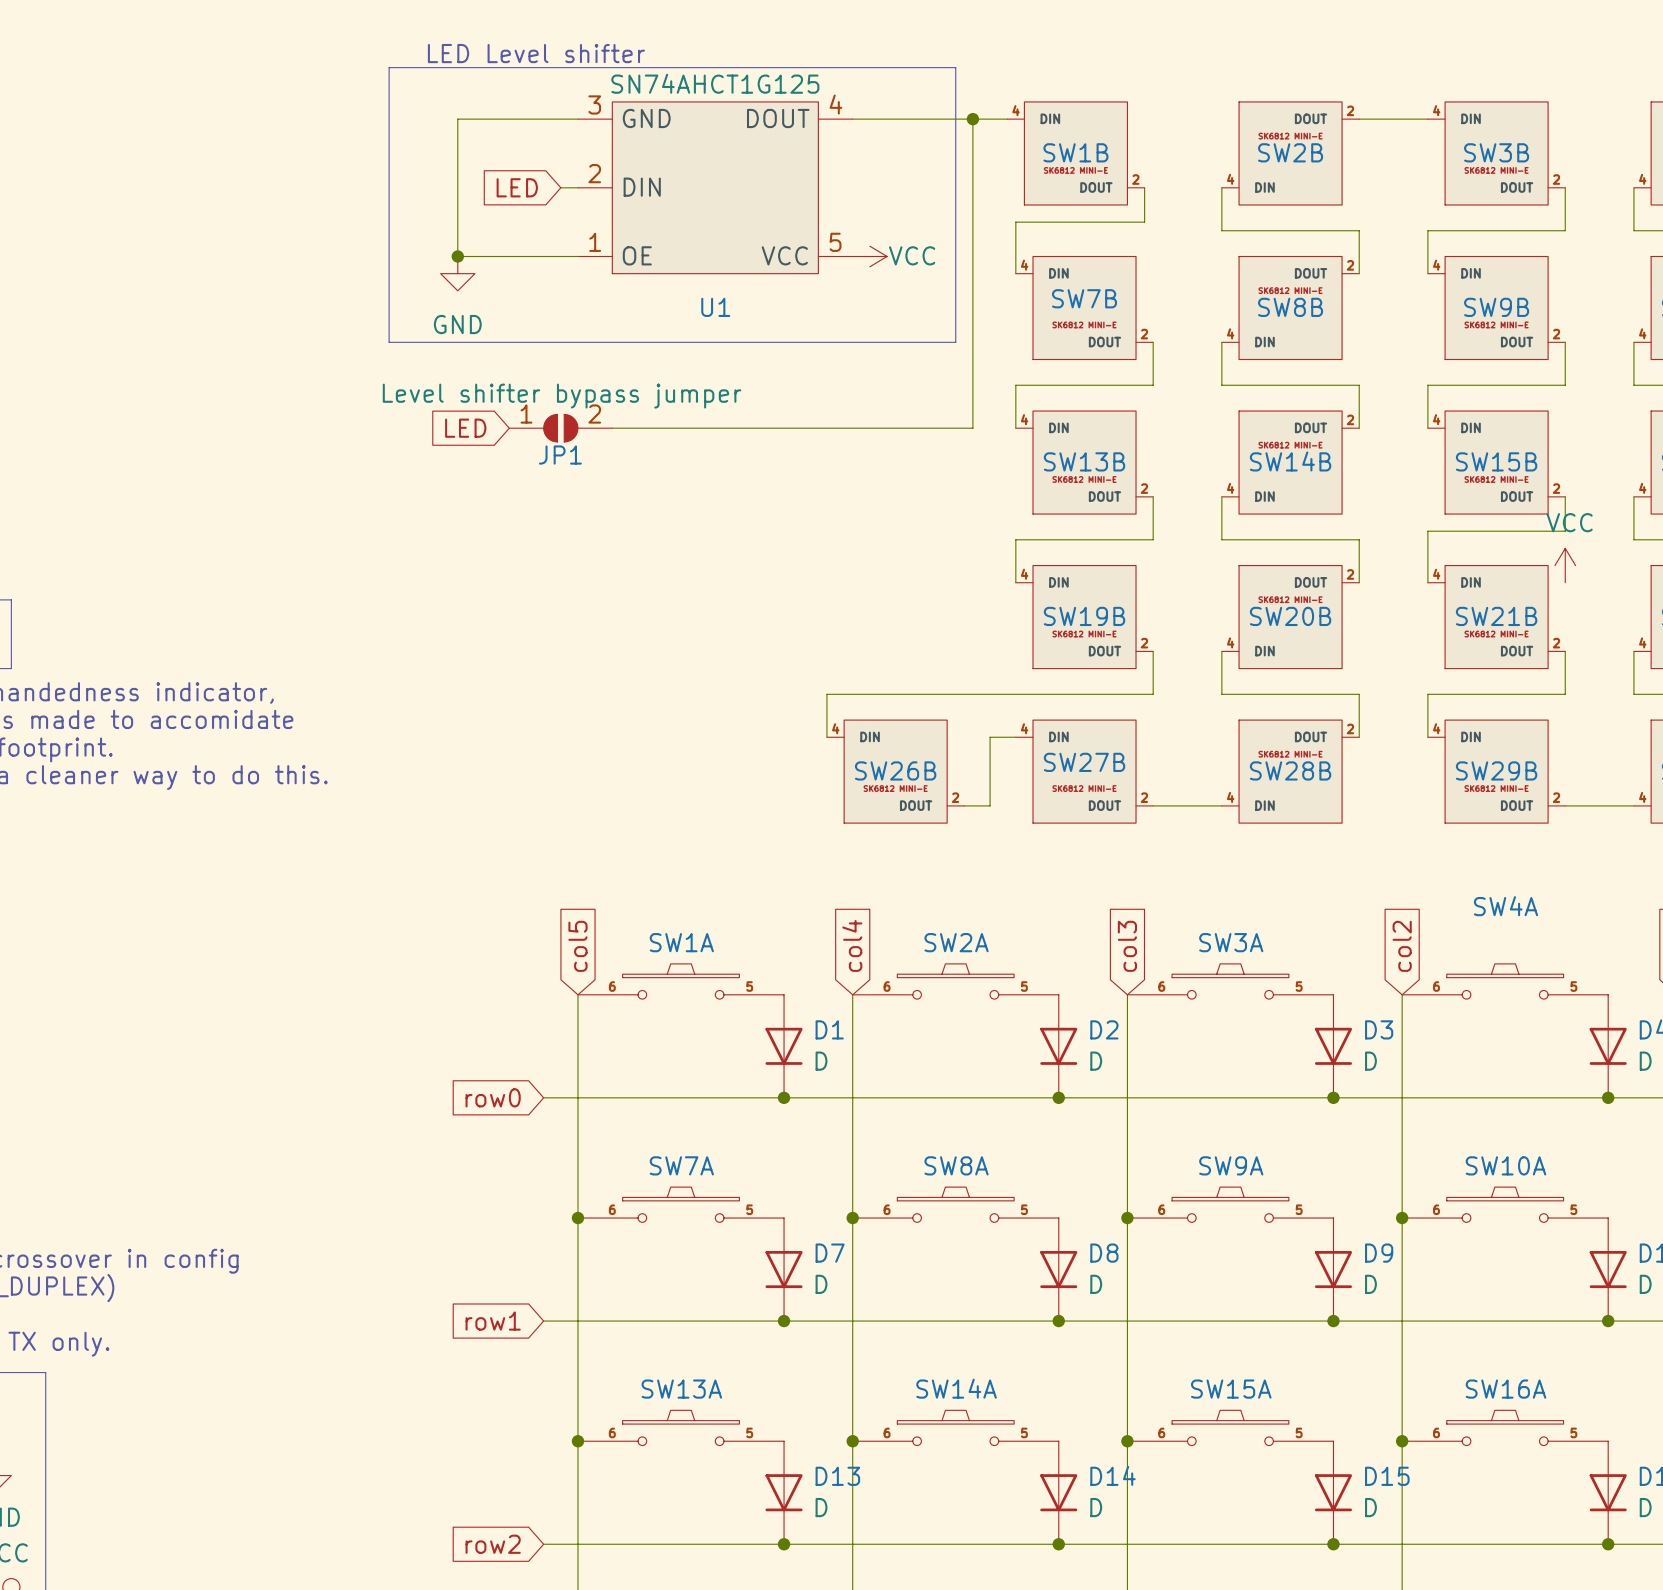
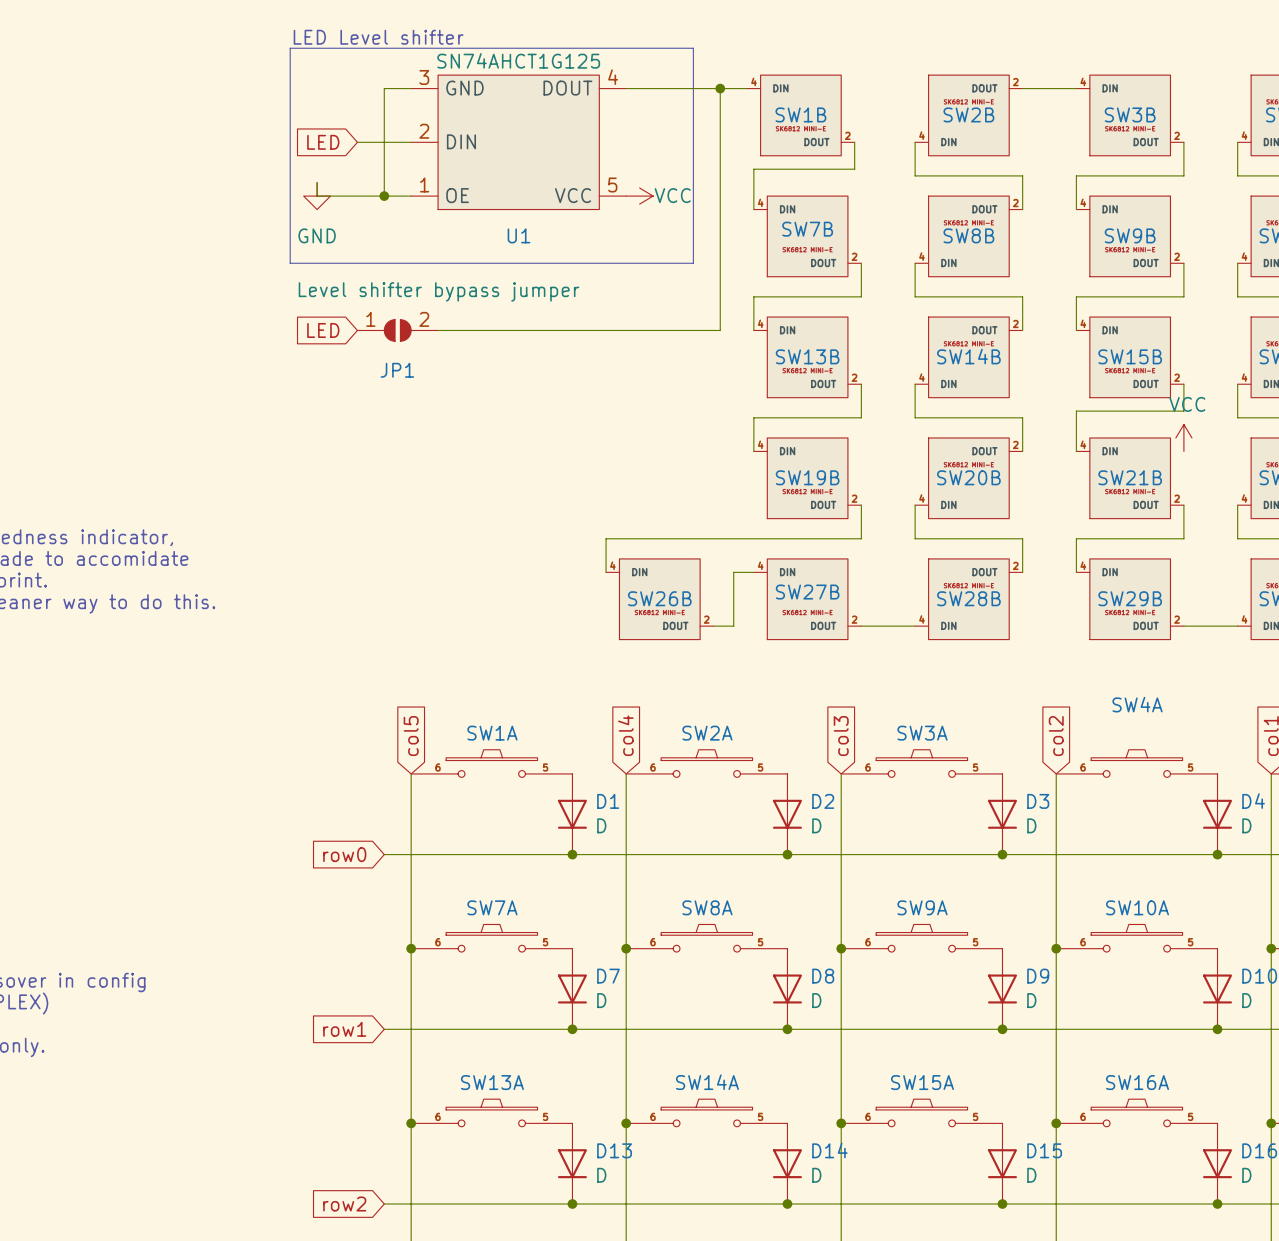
line: (423, 67) (389, 67) (389, 342) (423, 342) -> (290, 48) (290, 263)
line: (938, 67) (955, 67) (955, 342) (938, 342) -> (693, 48) (693, 263)
wire: (543, 119) (457, 119) (457, 239) -> (384, 88) (384, 196)
wire: none -> (357, 142) (397, 142)
global label position: LED (517, 187) -> LED (323, 142)
junction: (457, 256) -> none
junction: none -> (384, 196)
power symbol position: GND (457, 273) -> GND (317, 196)
JP1 value position: Level shifter bypass jumper (562, 396) -> Level shifter bypass jumper (439, 291)
JP1 name position: JP1 (560, 455) -> JP1 (397, 370)

